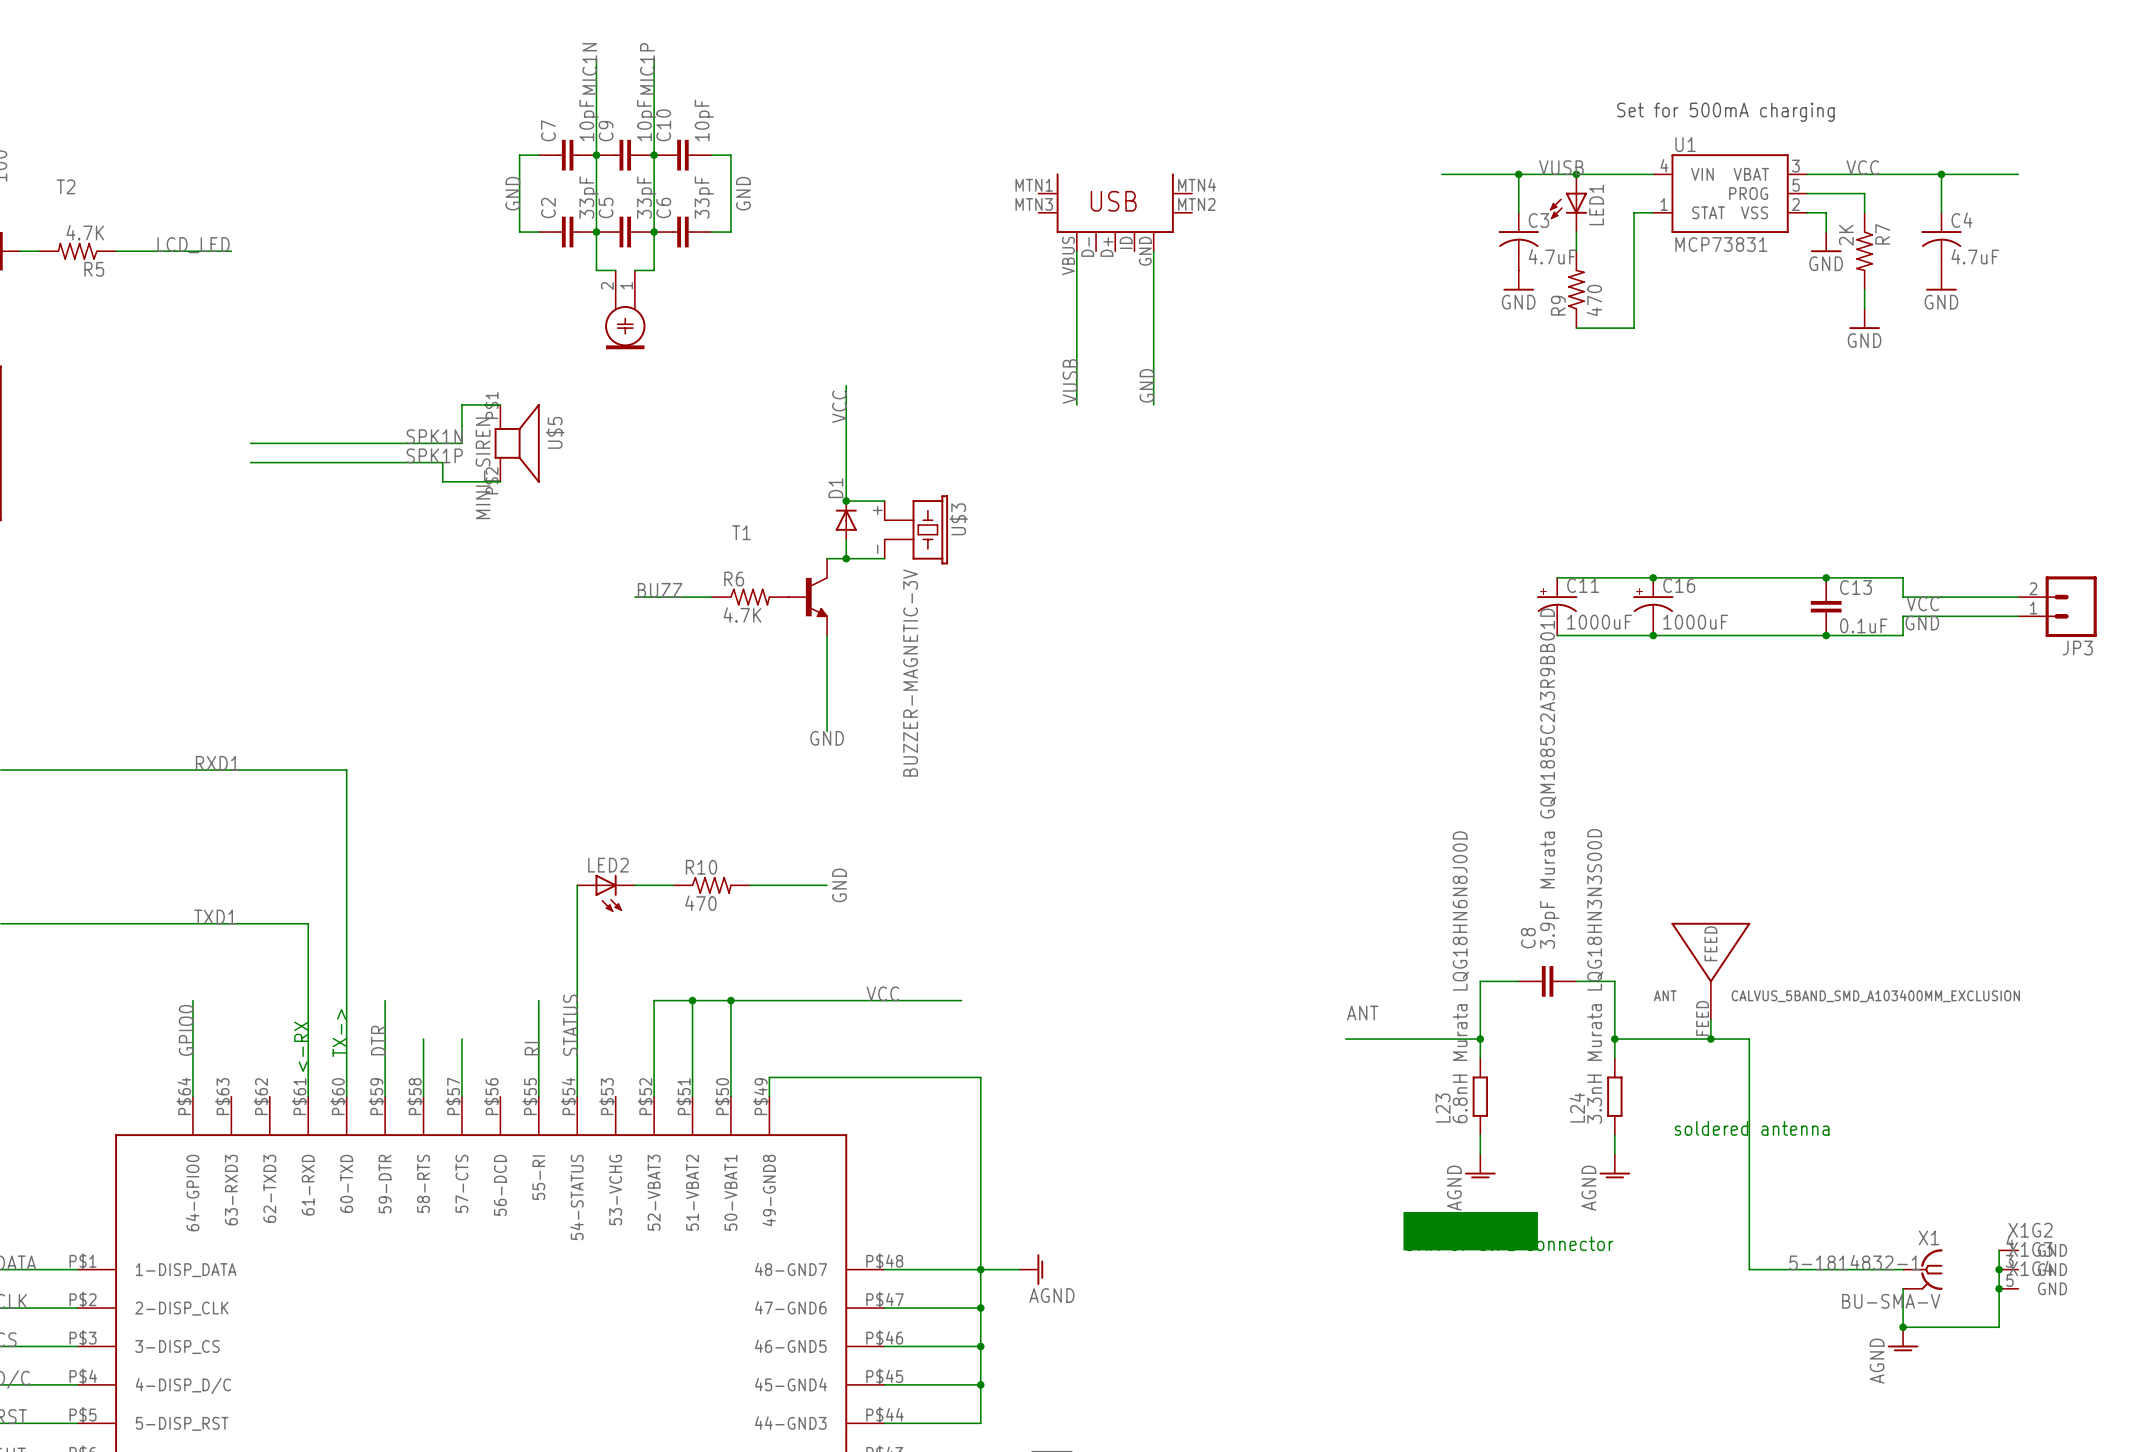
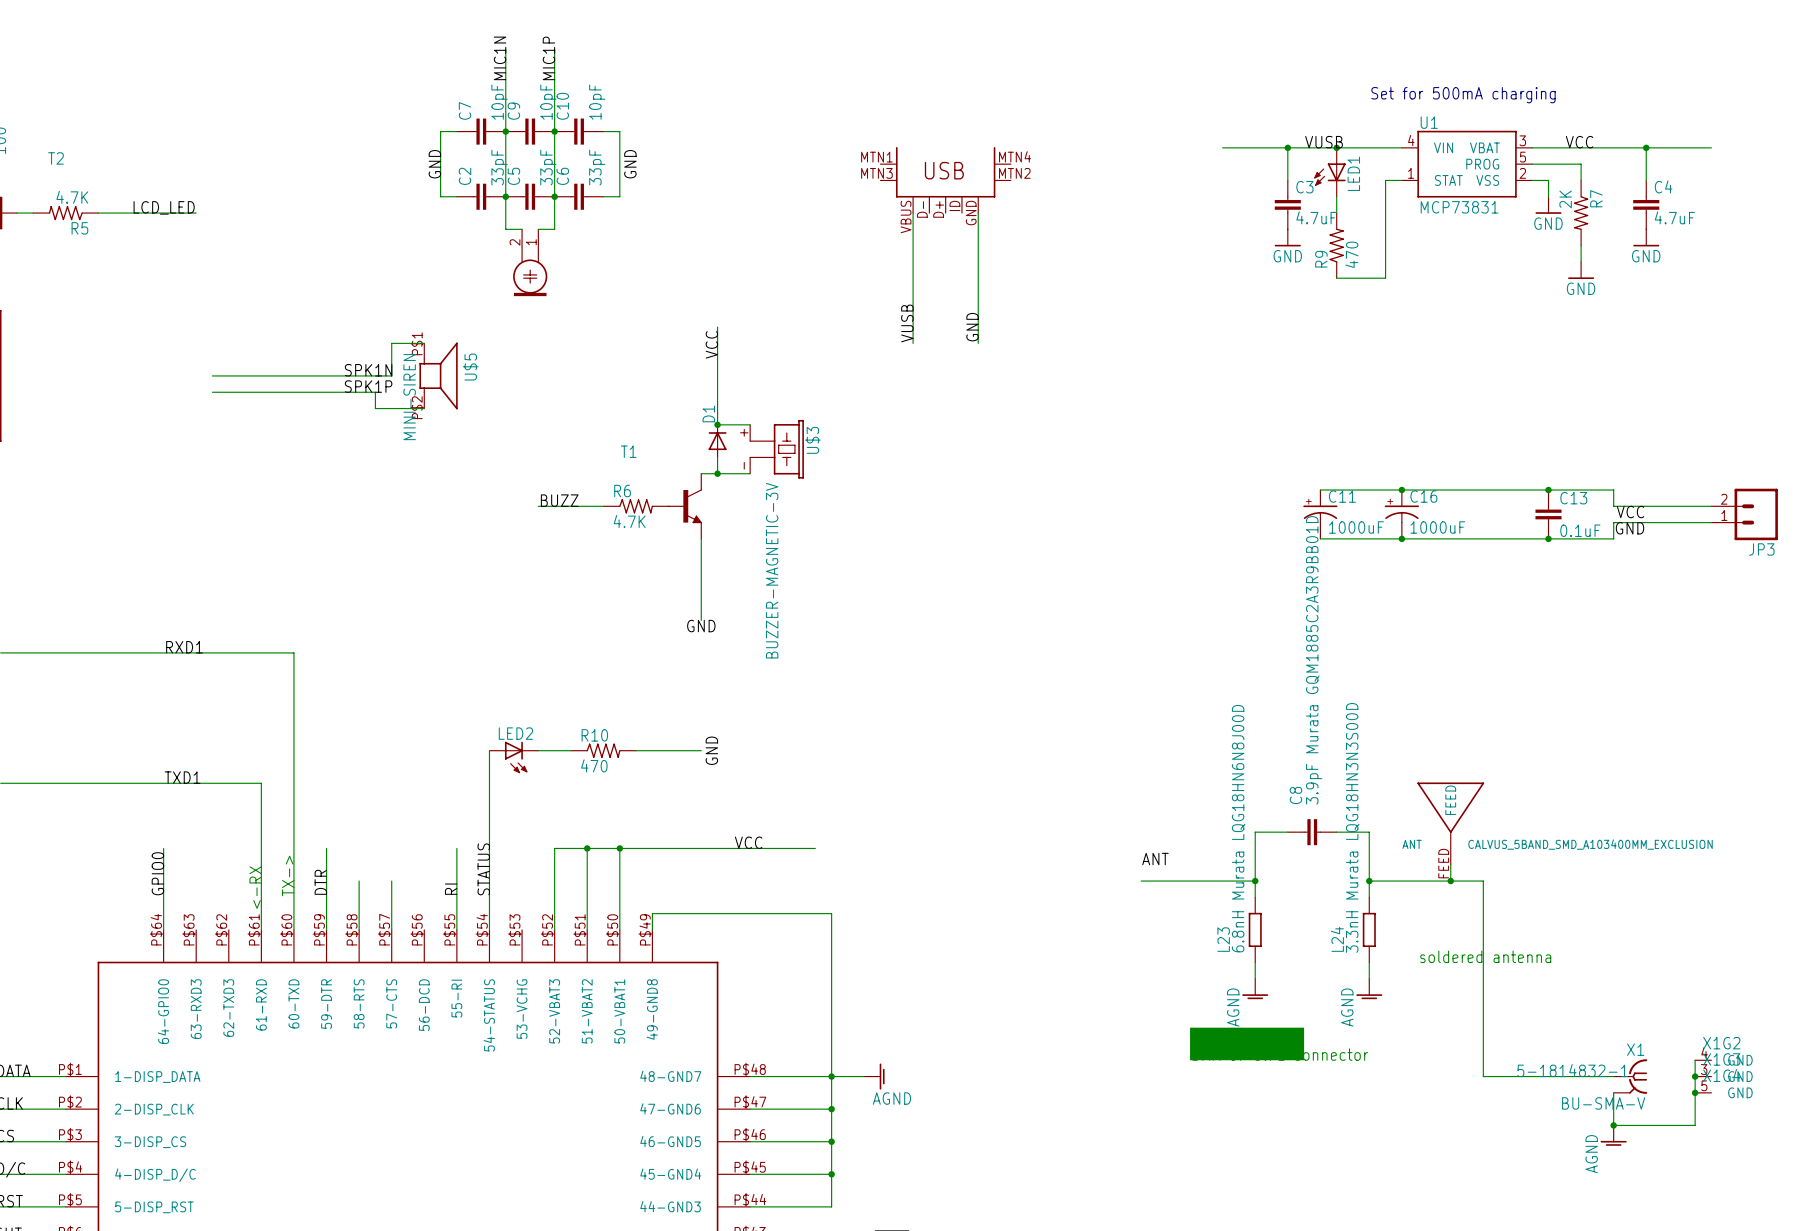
C3 symbol: [1498, 212, 1539, 271] -> [1274, 180, 1301, 230]
C4 symbol: [1921, 212, 1962, 271] -> [1633, 180, 1660, 230]

